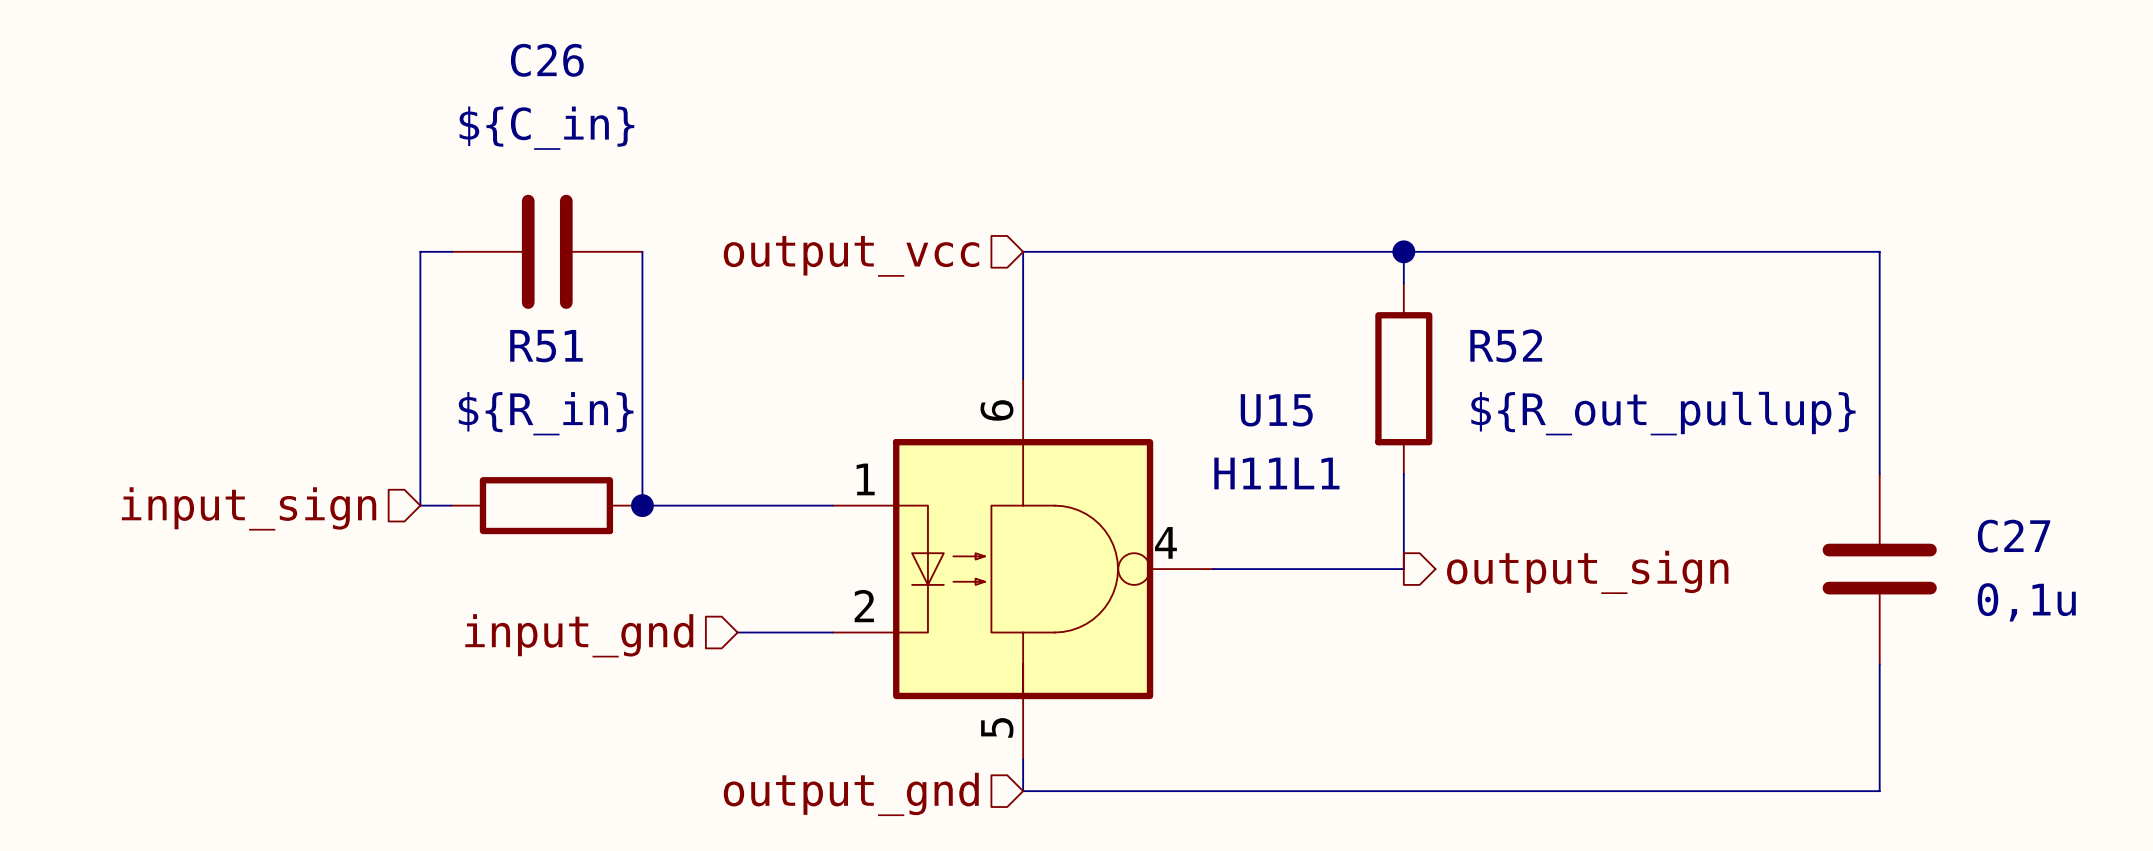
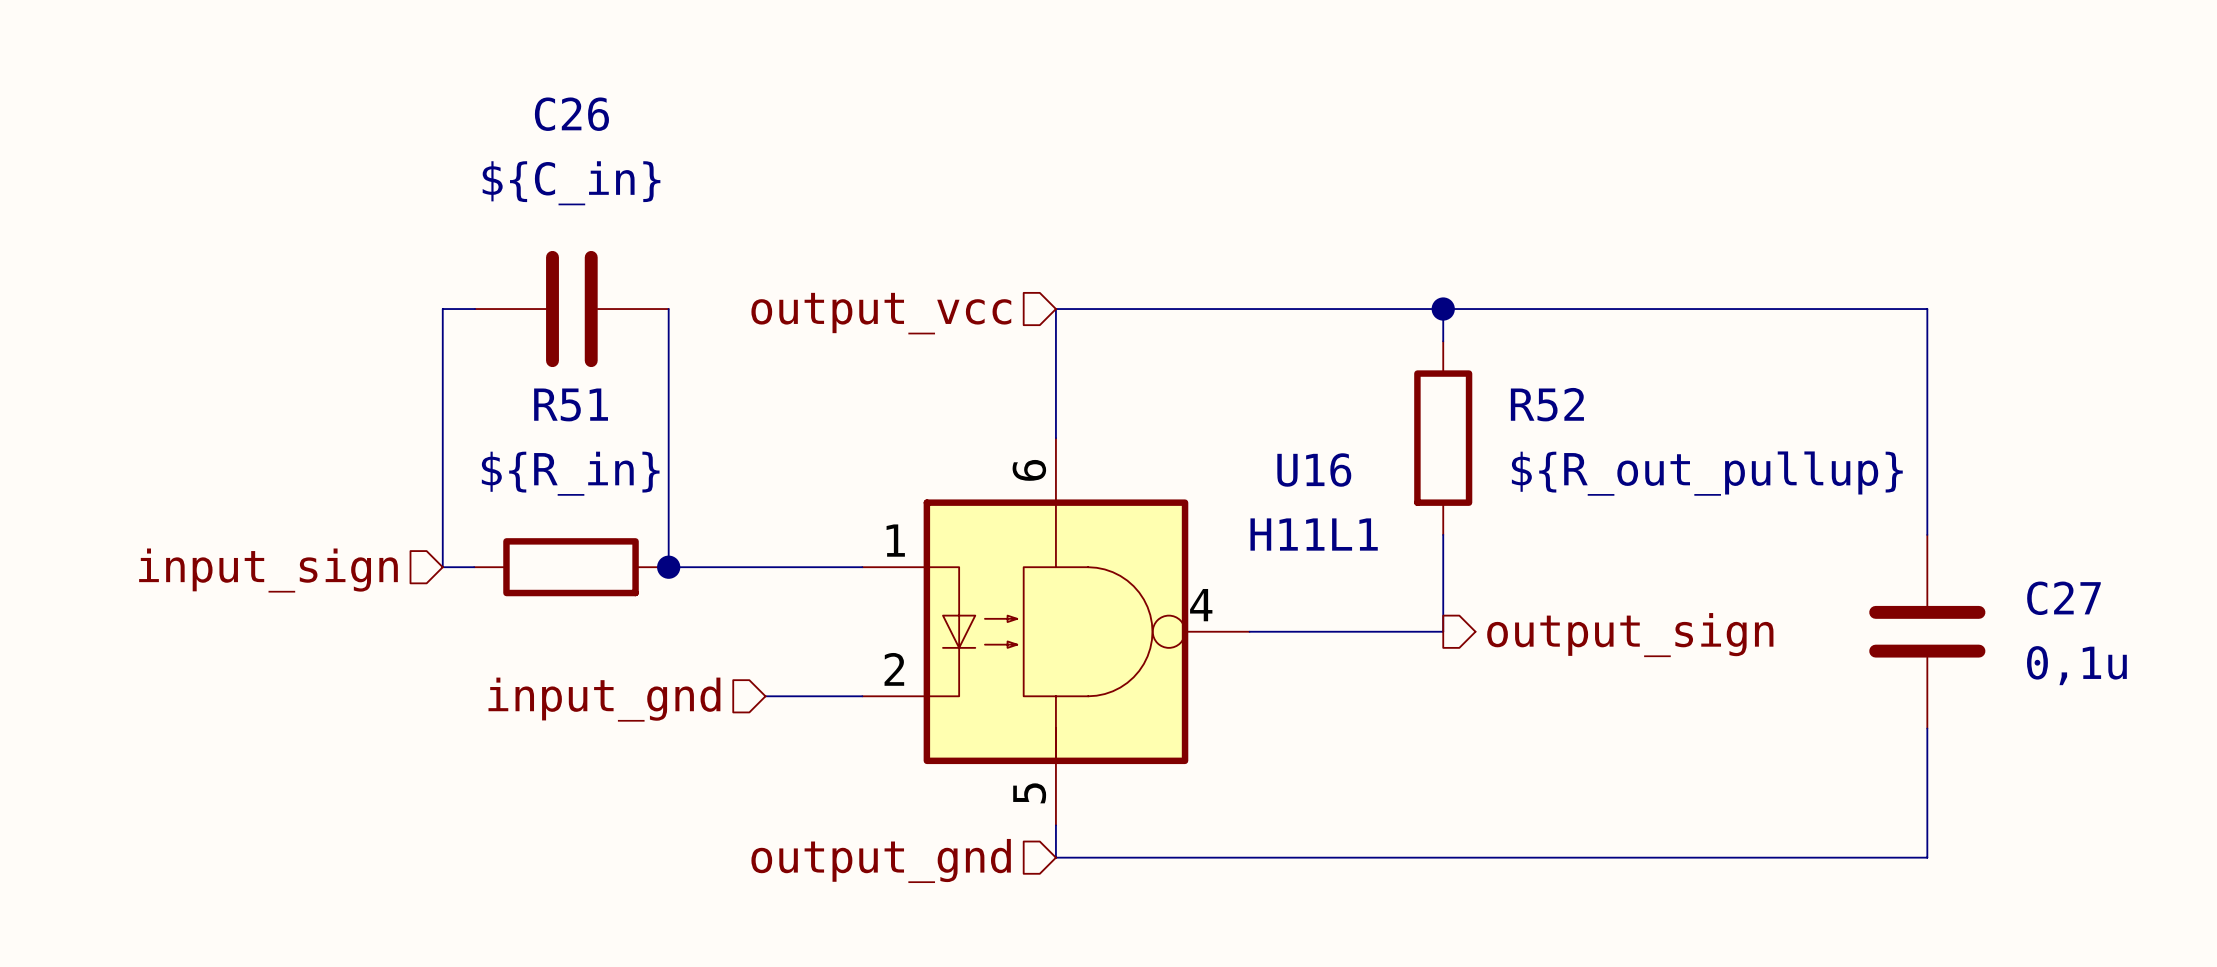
U15 name: U15 (1276, 410) -> U16 (1314, 470)

